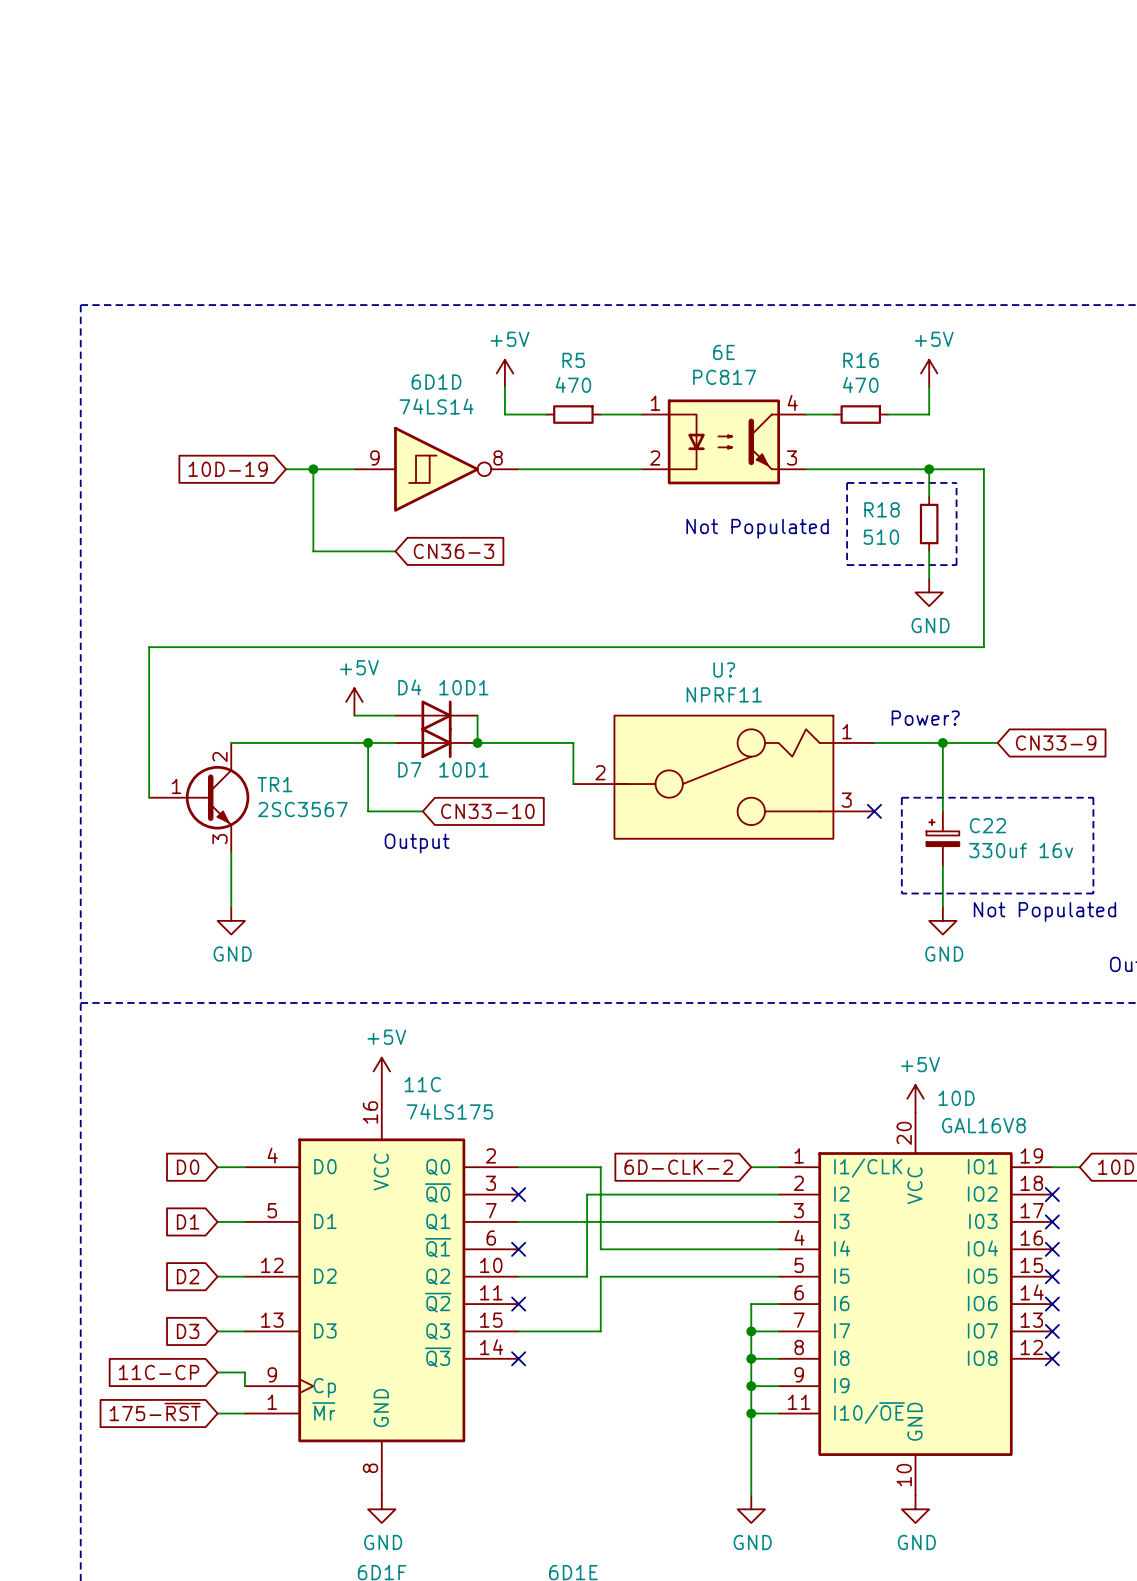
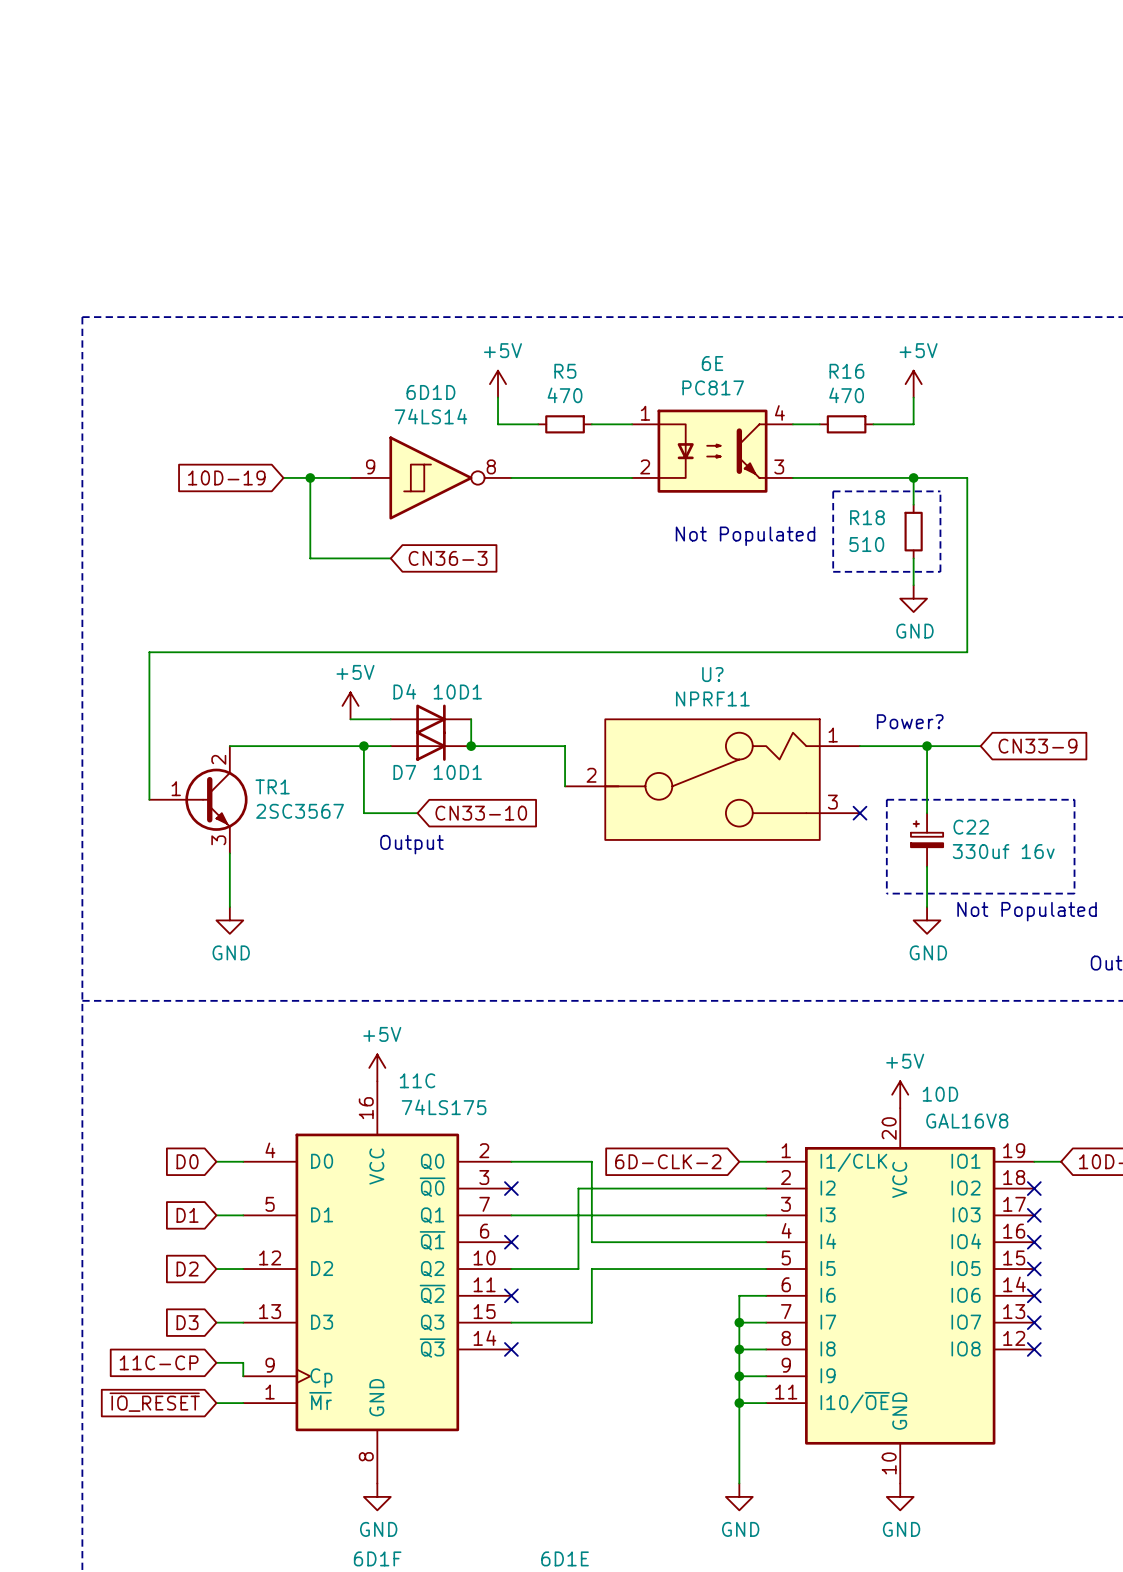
global label: 175-~{RST} (155, 1411) -> ~{IO_RESET} (154, 1402)

